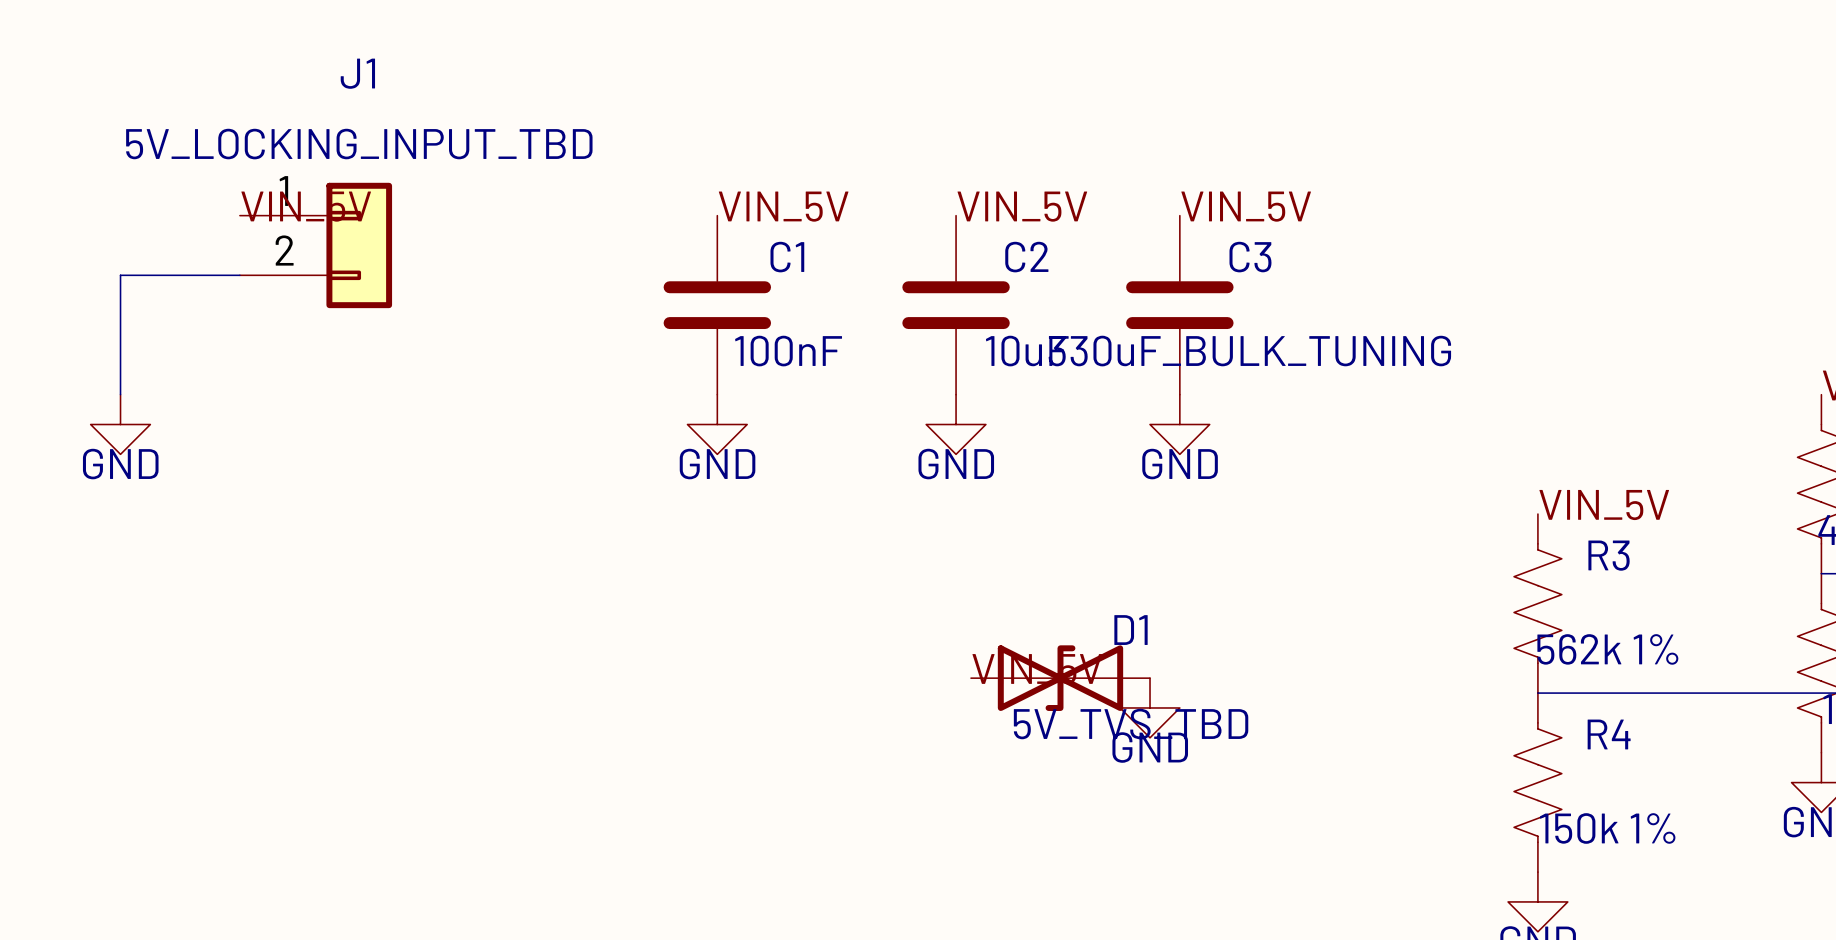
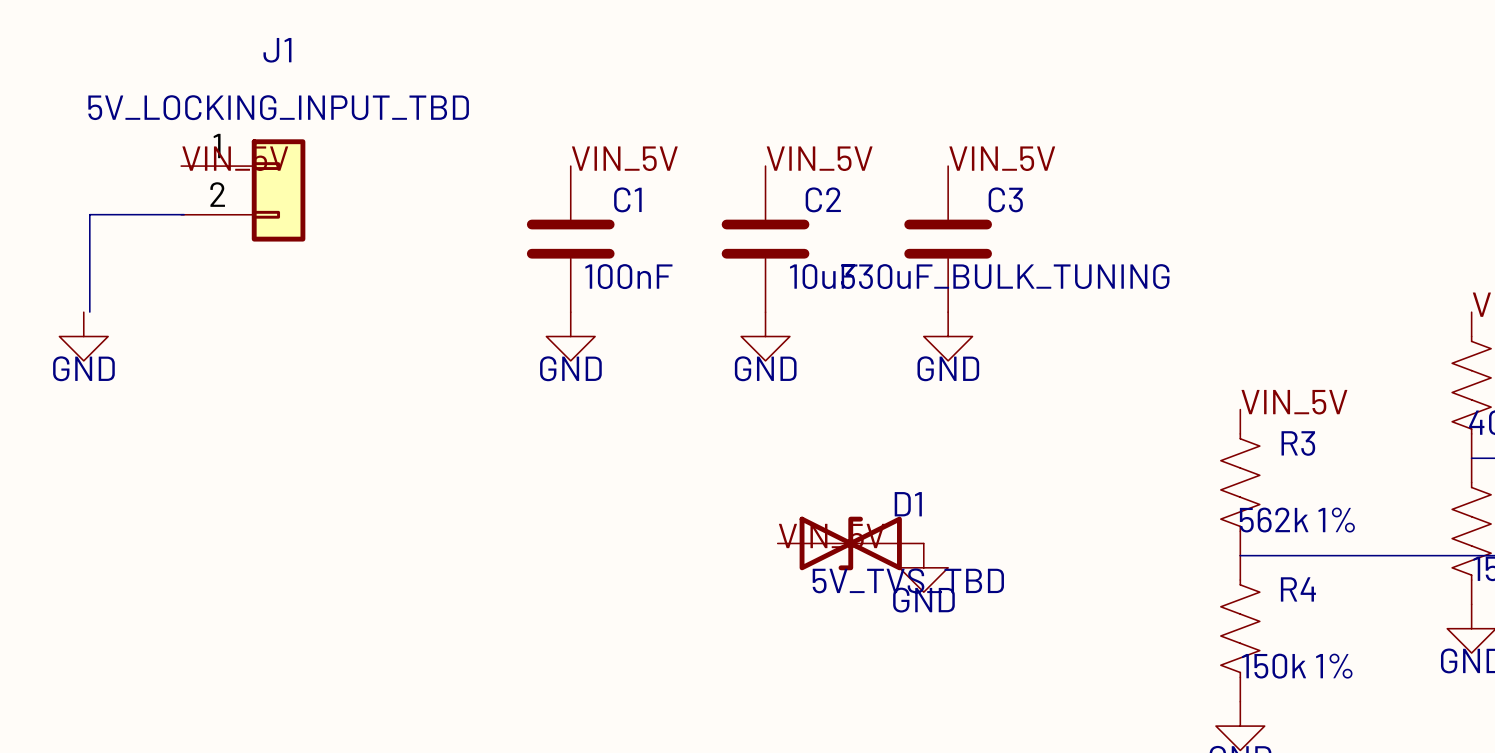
wire: (239, 275) (120, 275) (120, 394) -> none
wire: none -> (184, 214) (89, 214) (89, 312)

